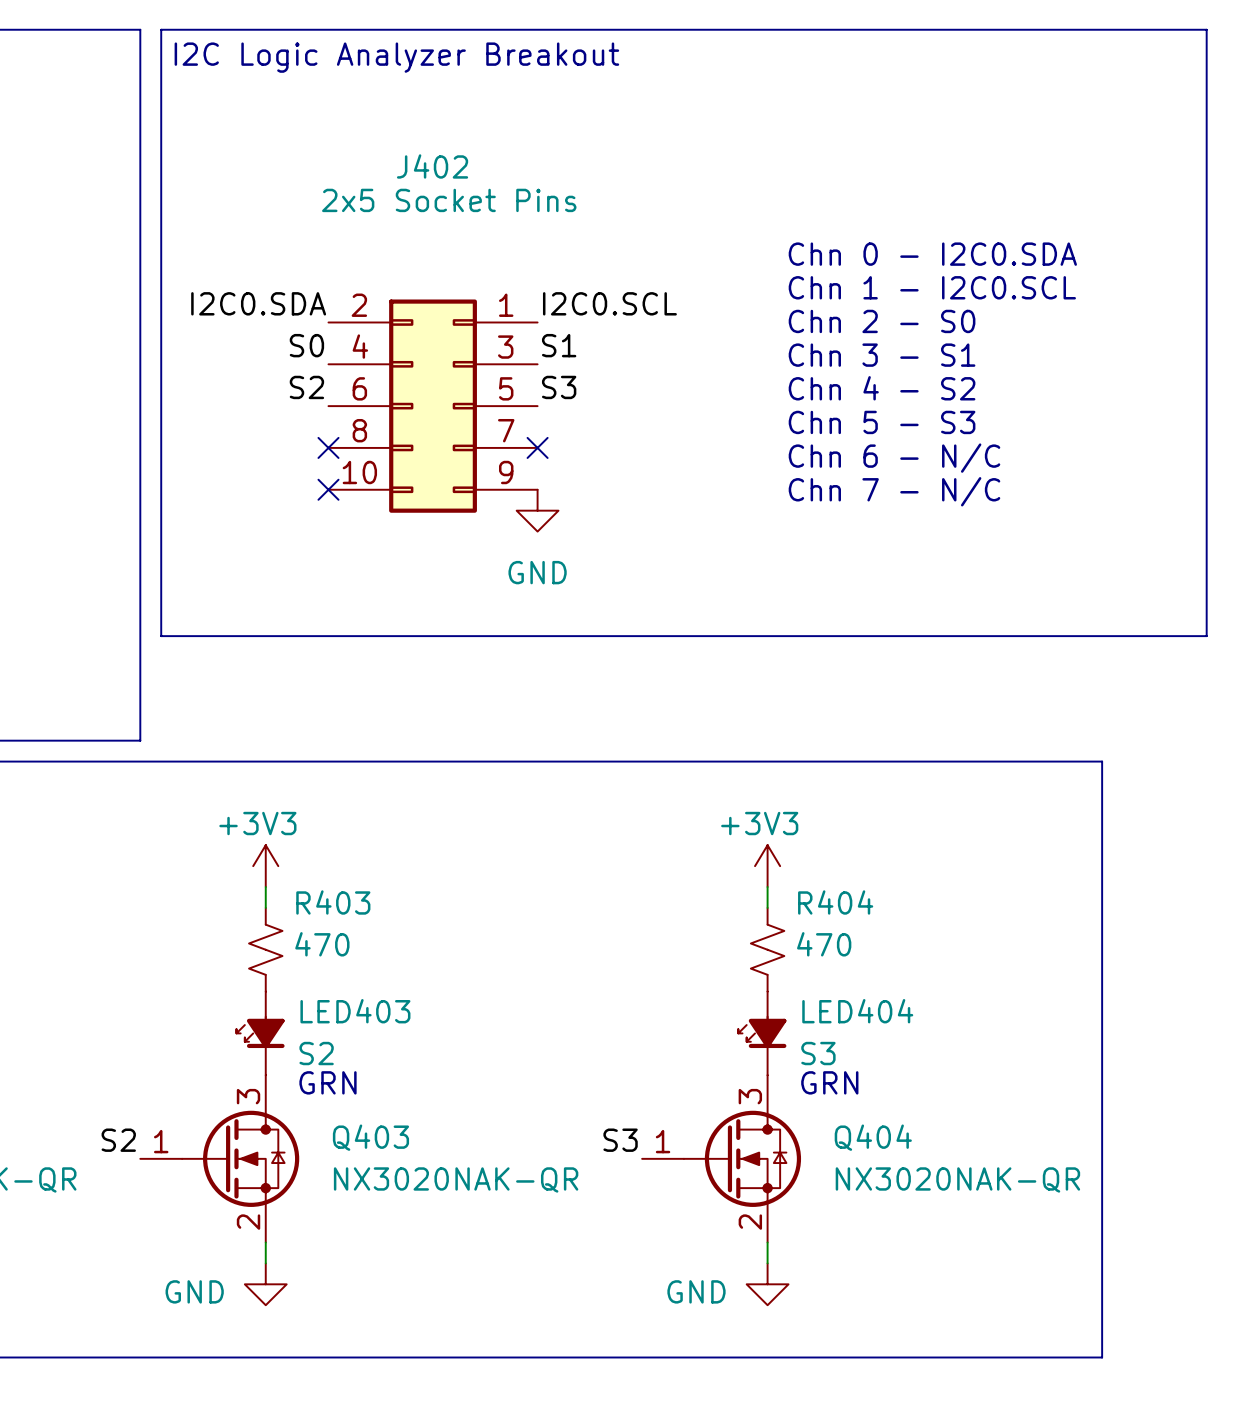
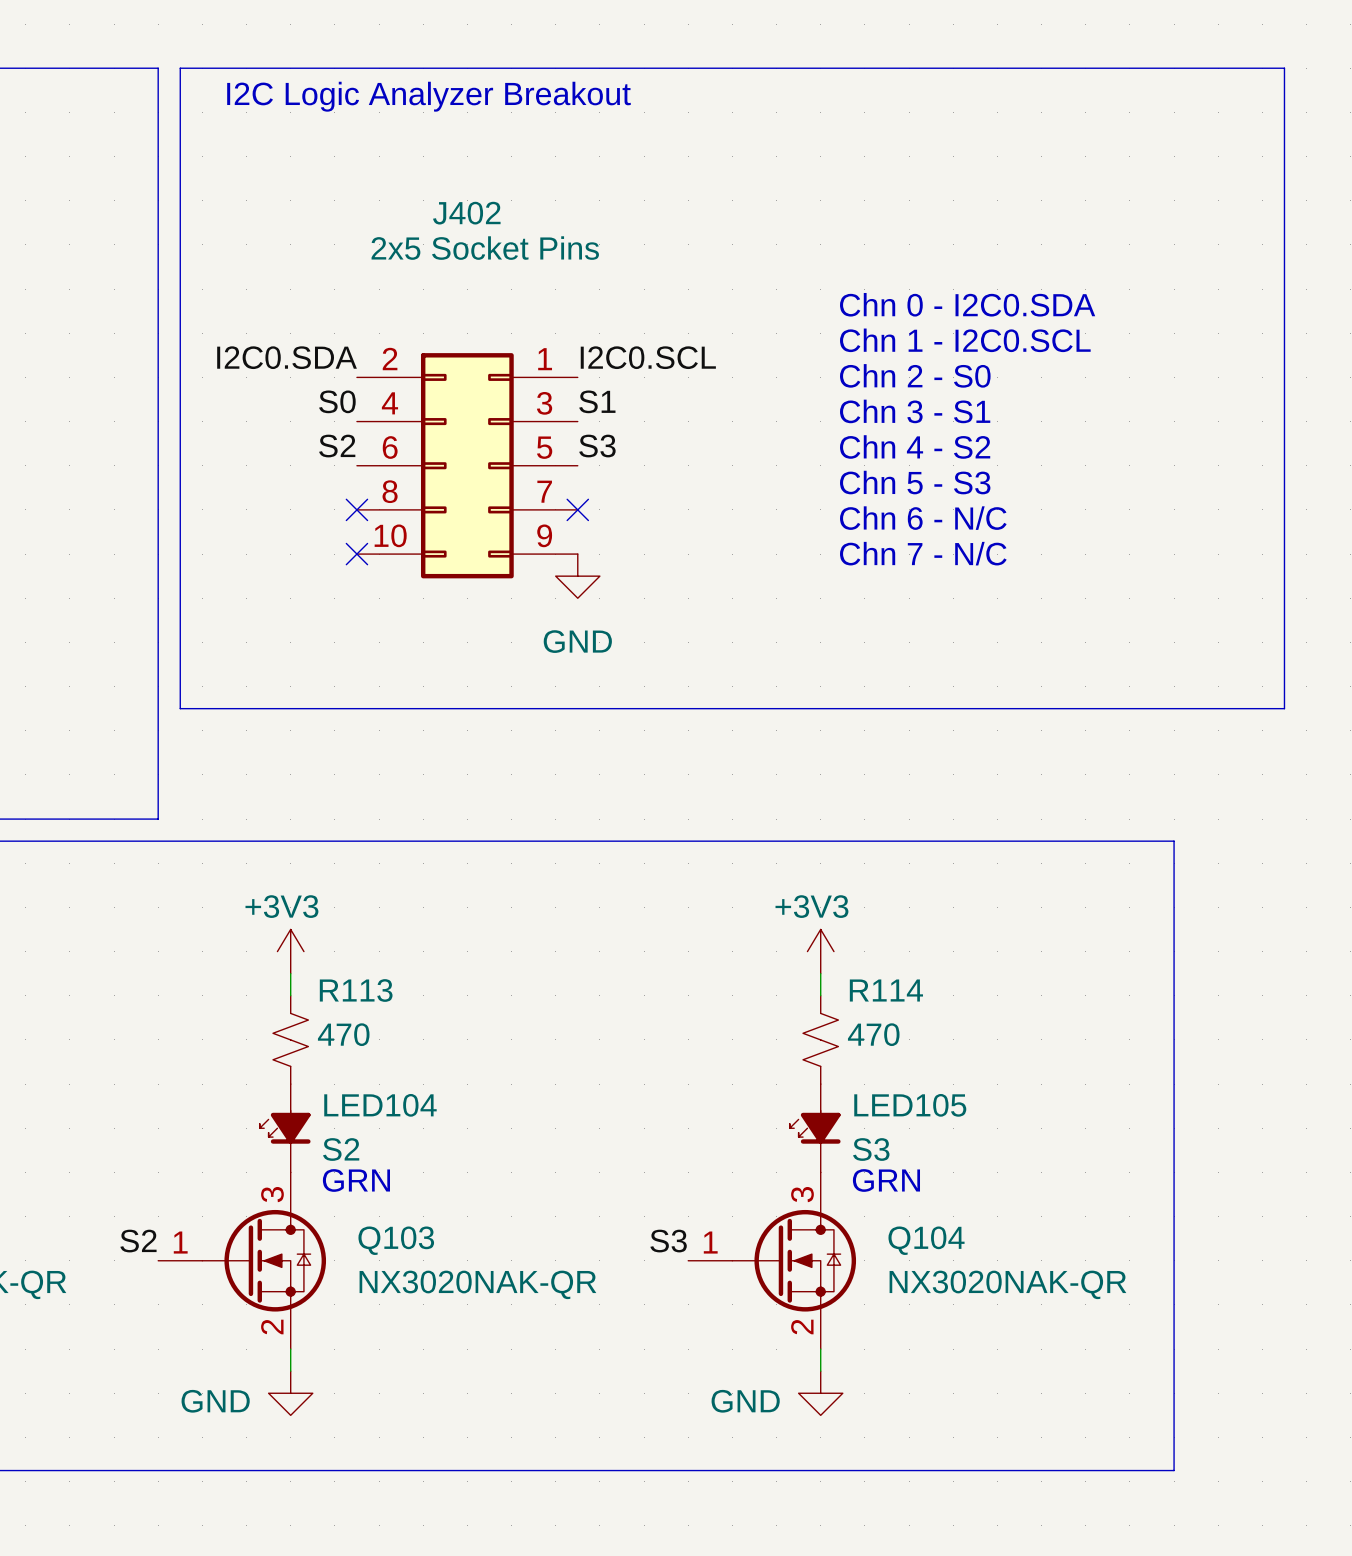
R403 name: R403 (333, 902) -> R113 (356, 990)
R404 name: R404 (835, 902) -> R114 (886, 990)
LED403 name: LED403 (355, 1011) -> LED104 (380, 1105)
LED404 name: LED404 (857, 1011) -> LED105 (910, 1105)
Q403 name: Q403 (370, 1137) -> Q103 (396, 1240)
Q404 name: Q404 (873, 1137) -> Q104 (926, 1240)

